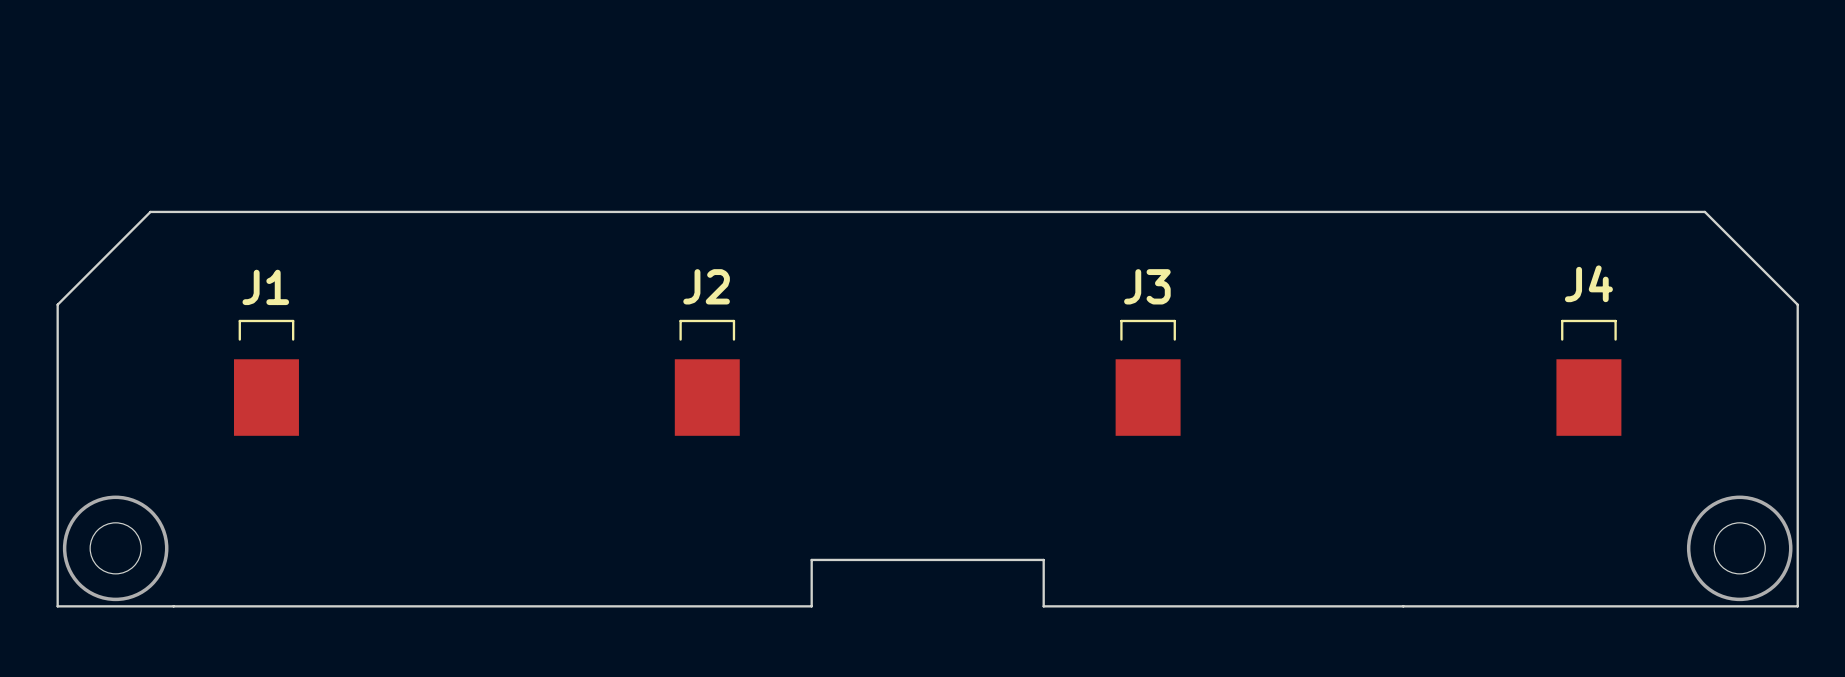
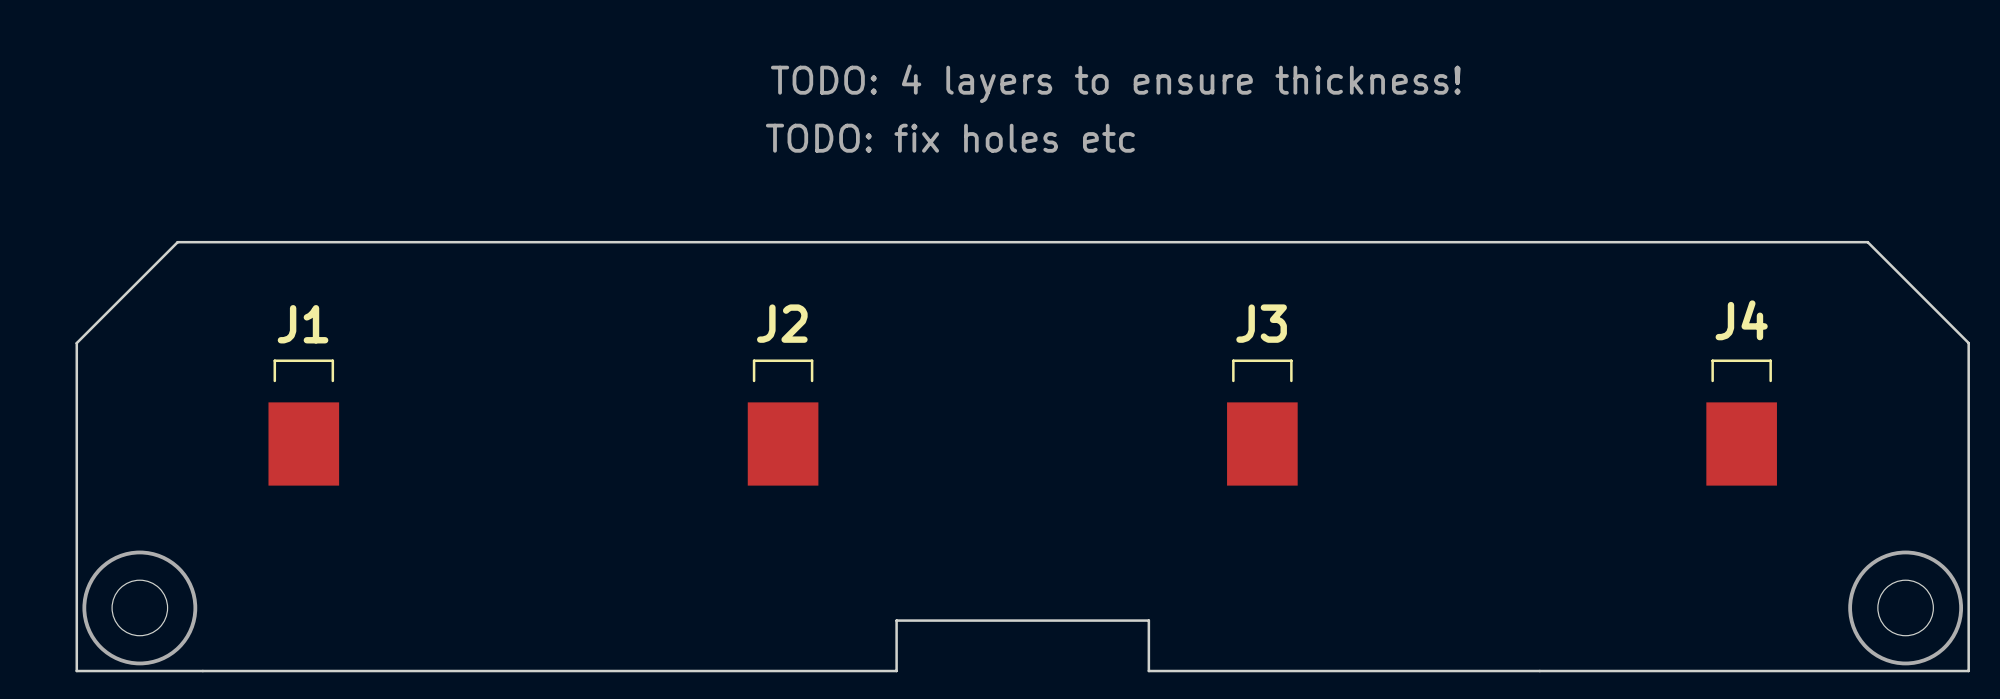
text: none -> TODO: 4 layers to ensure thickness! (1115, 83)
text: none -> TODO: fix holes etc (950, 138)

